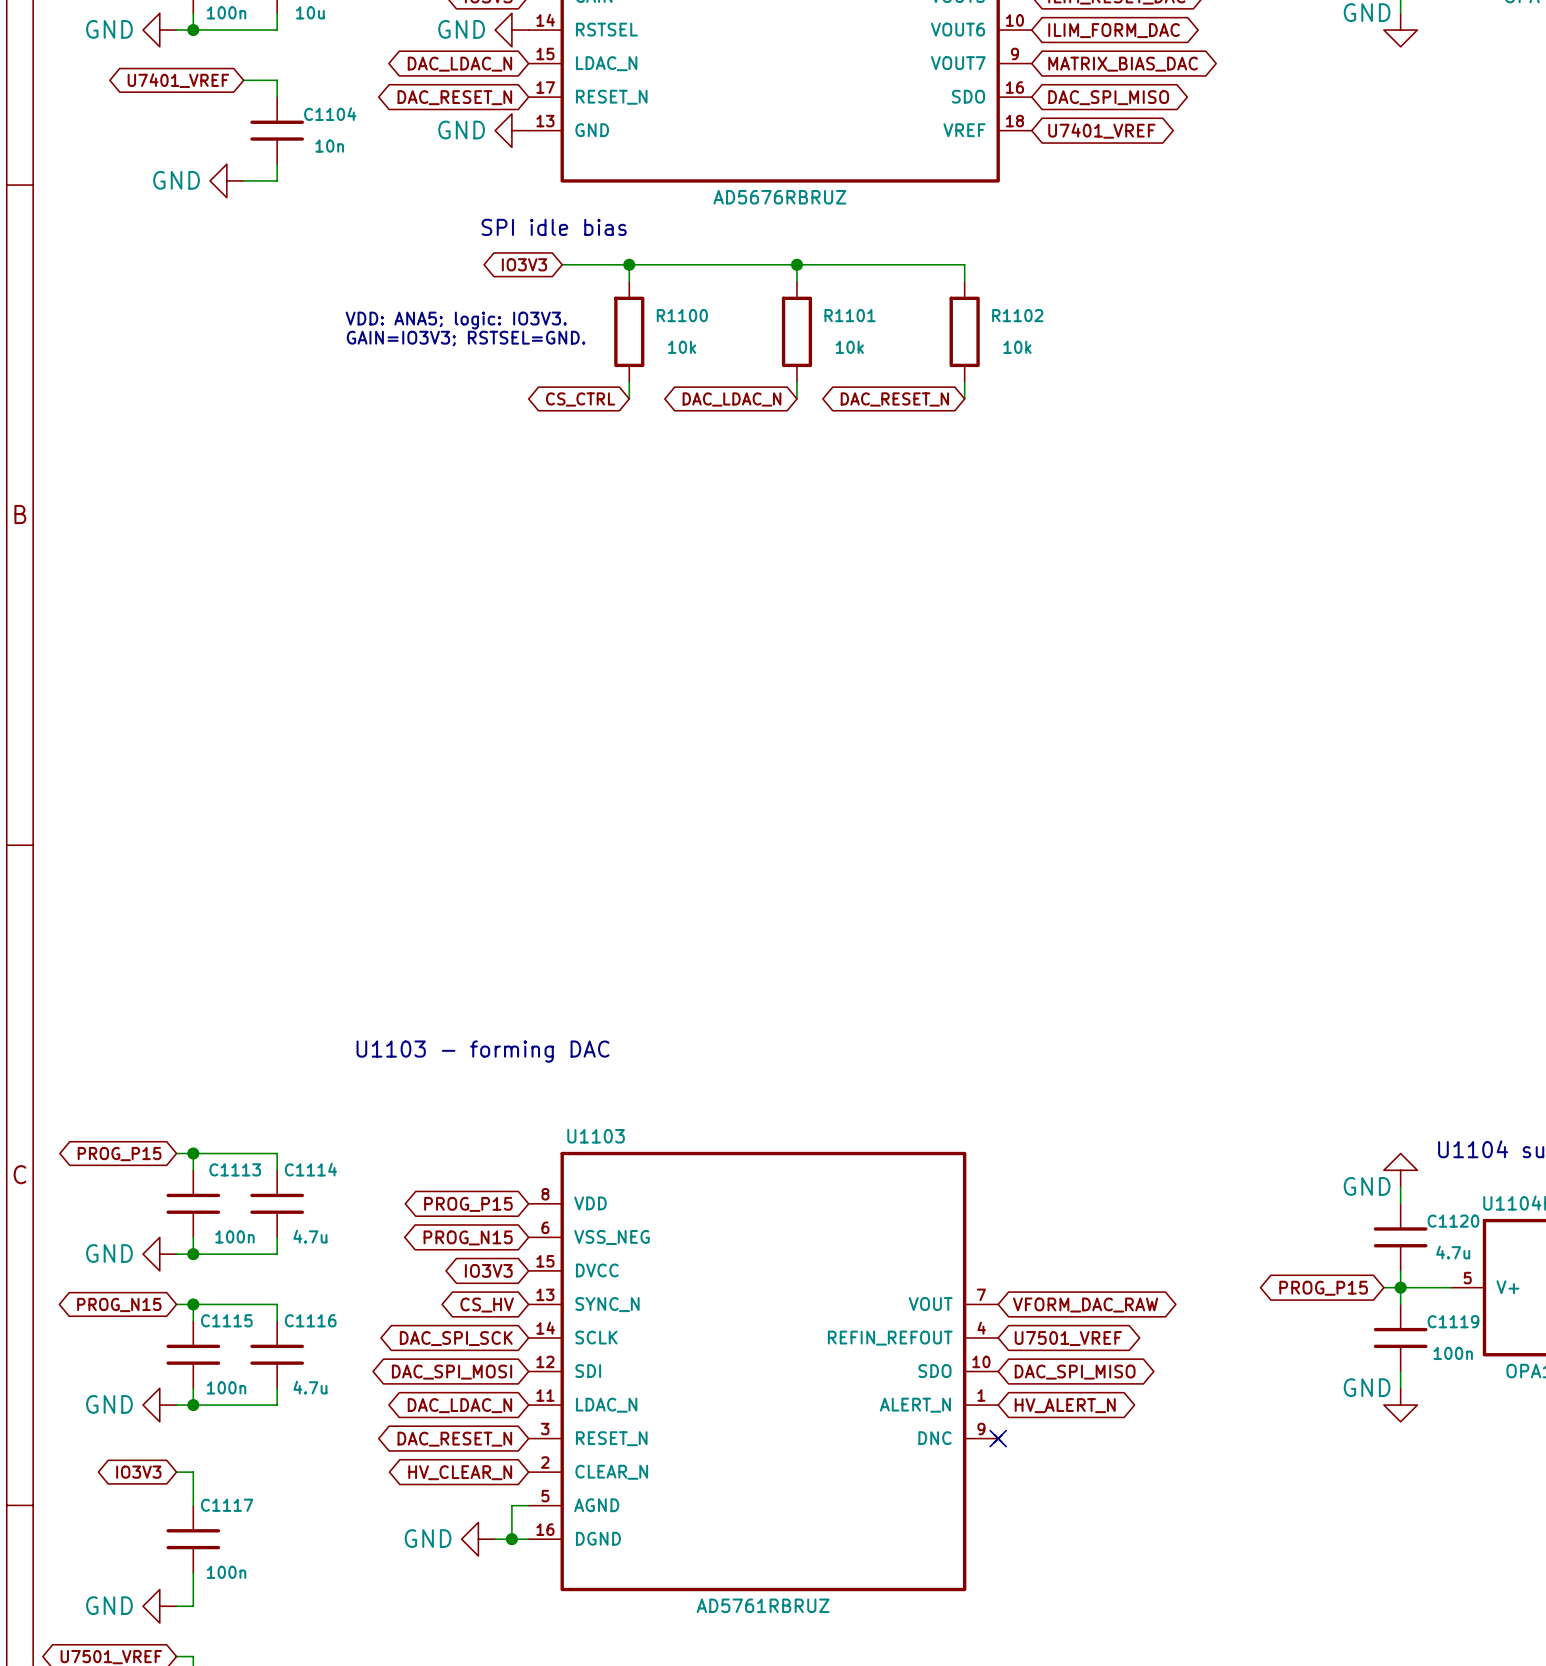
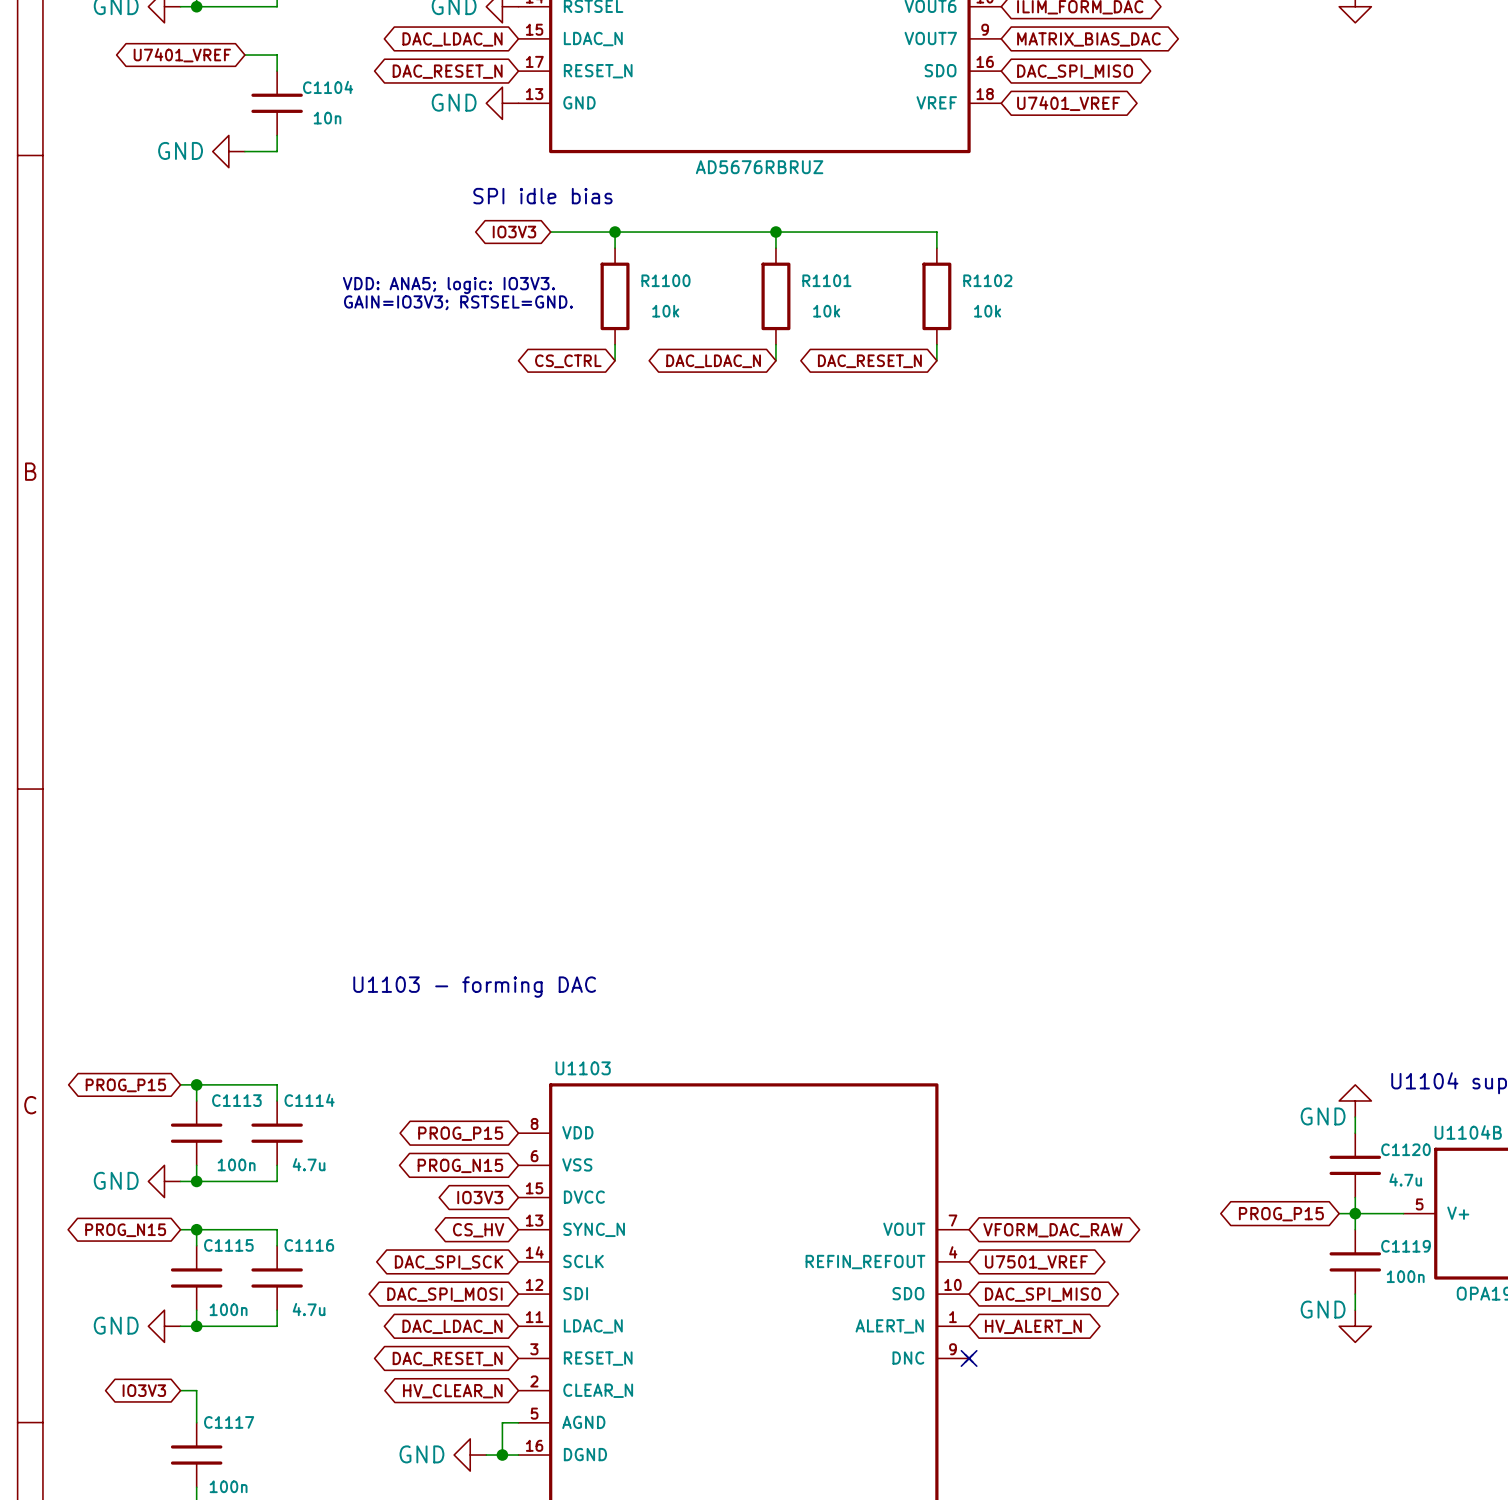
U1103 pin name: VSS_NEG (612, 1237) -> VSS (577, 1164)

